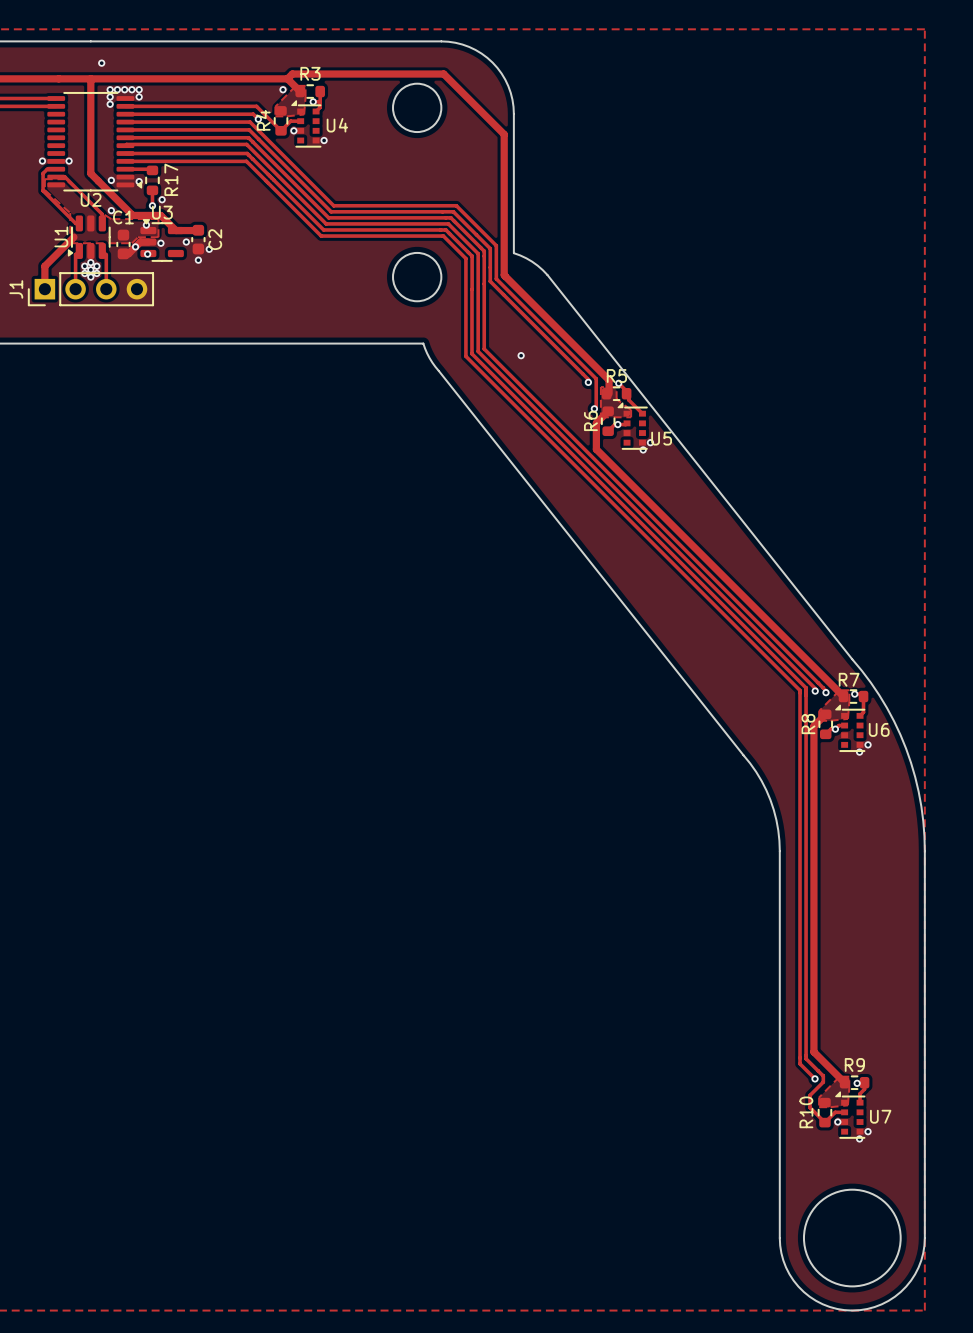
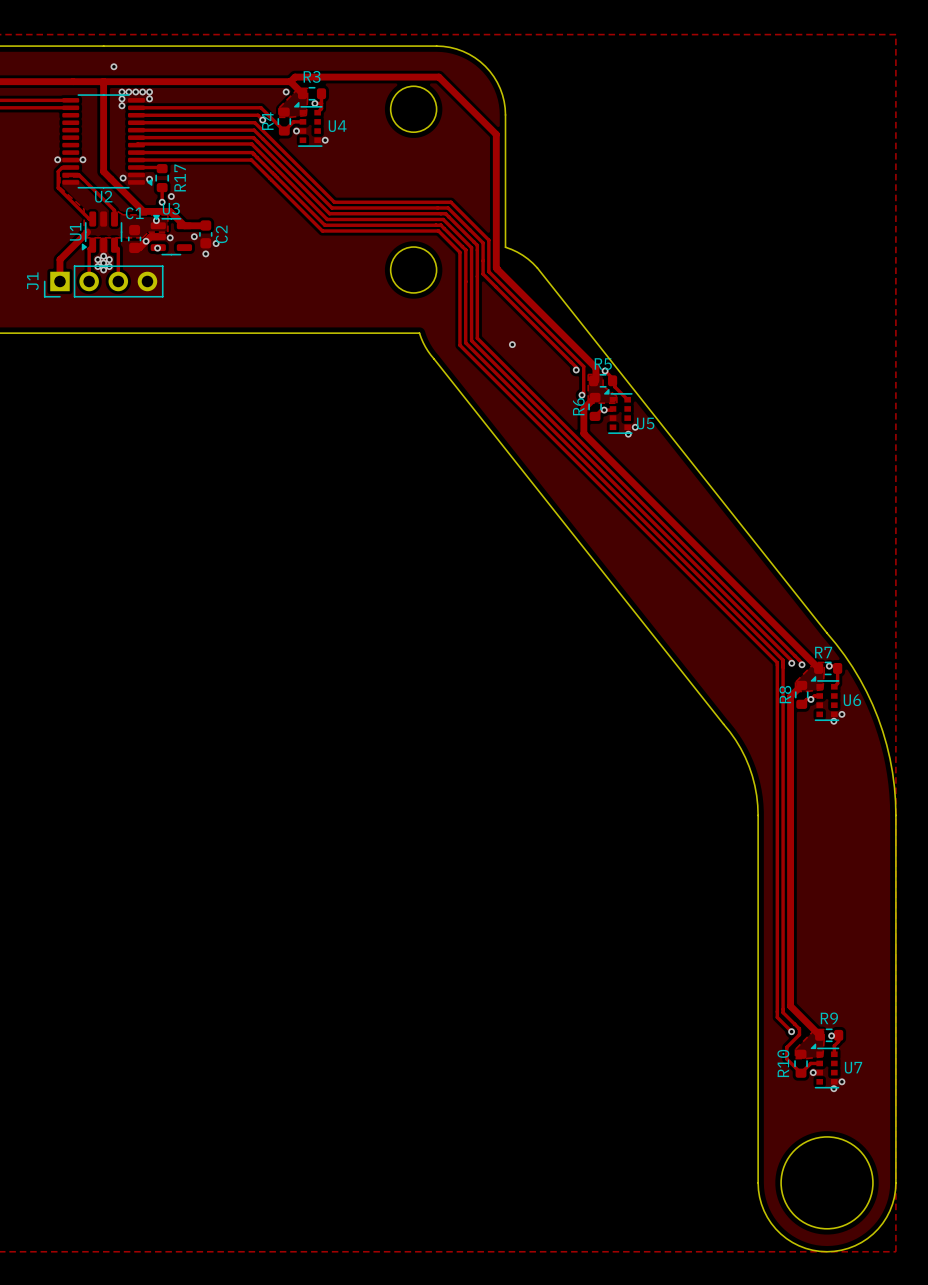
via: (111, 210) -> none

